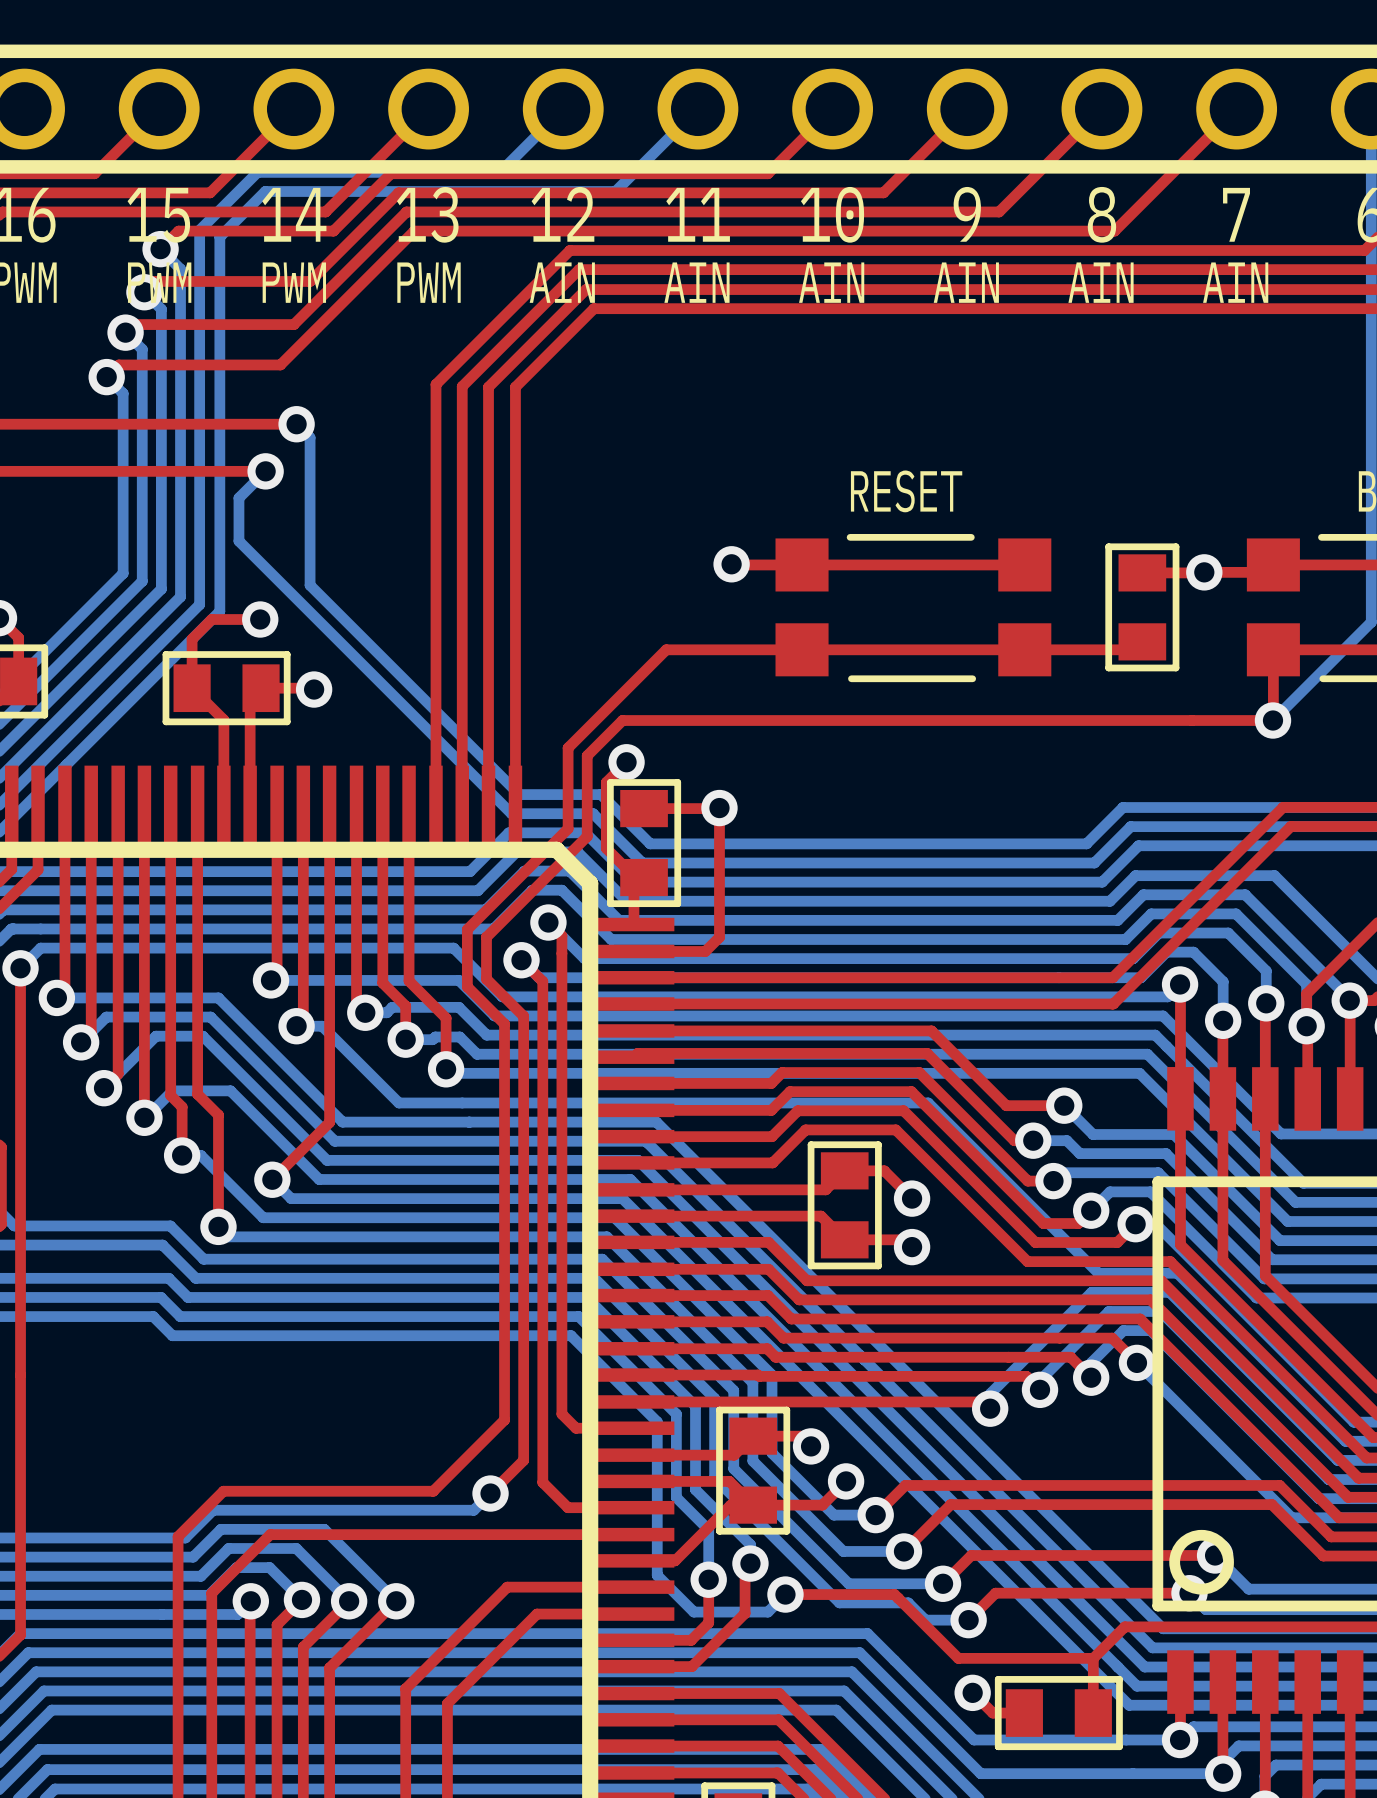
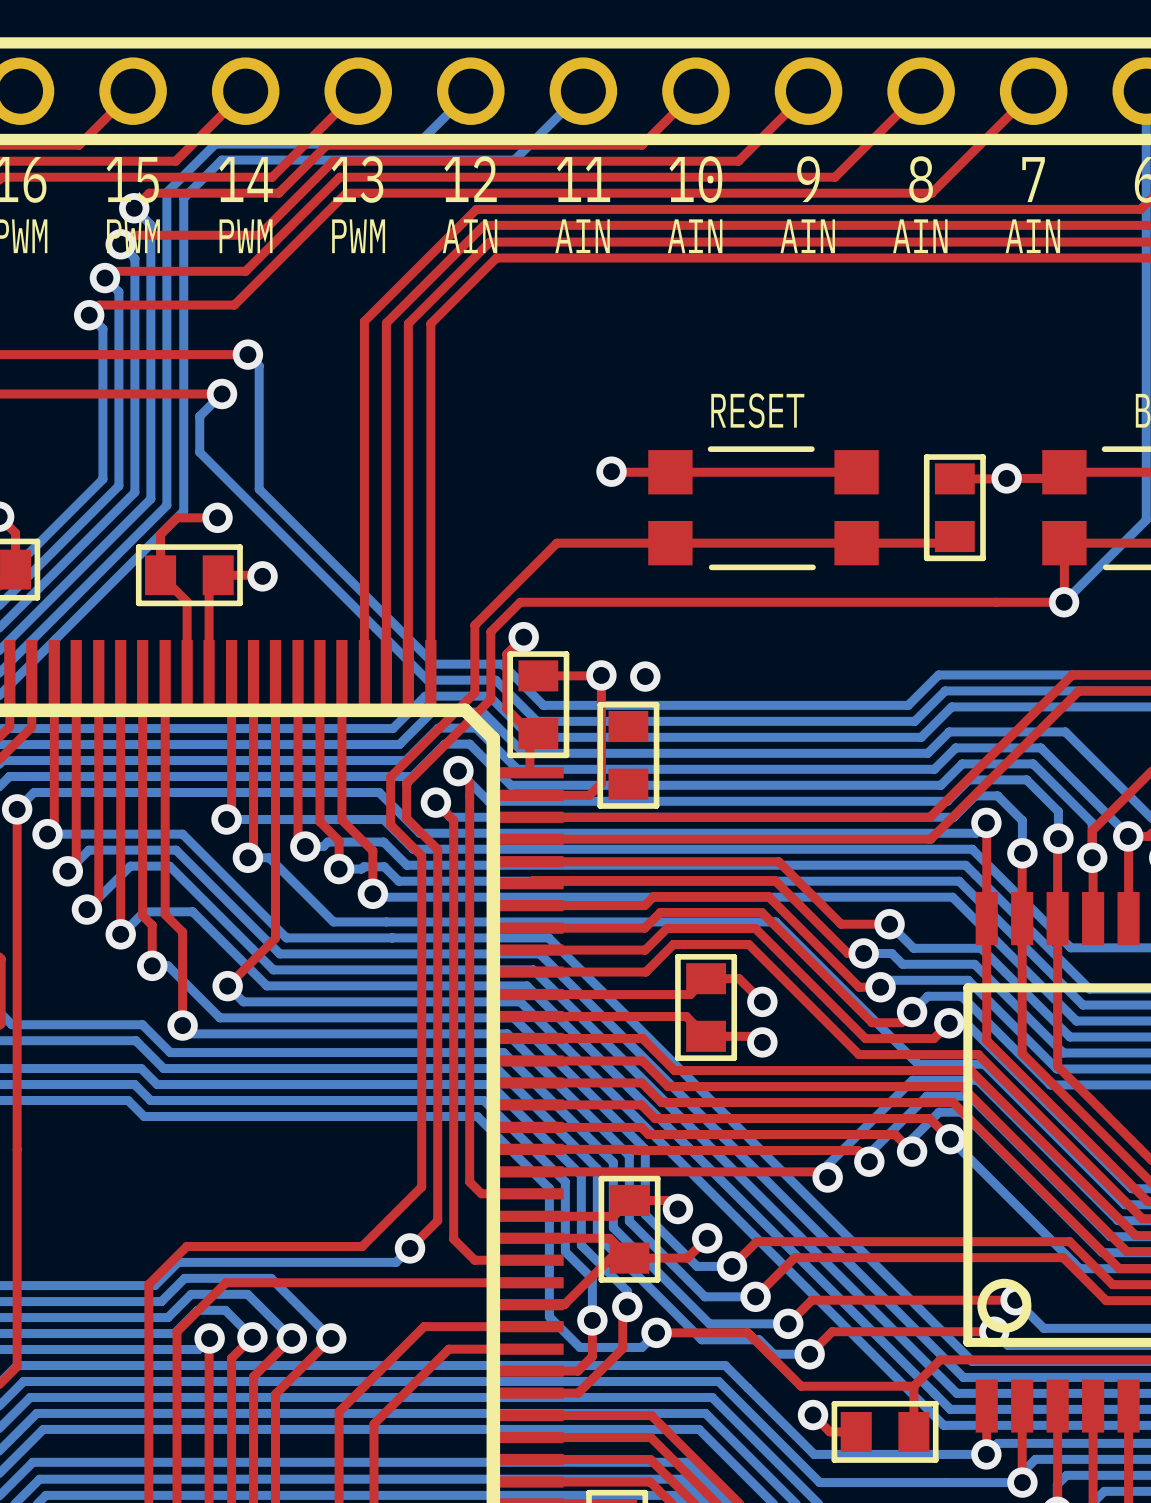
via: none -> (645, 676)
part: none -> (628, 755)

